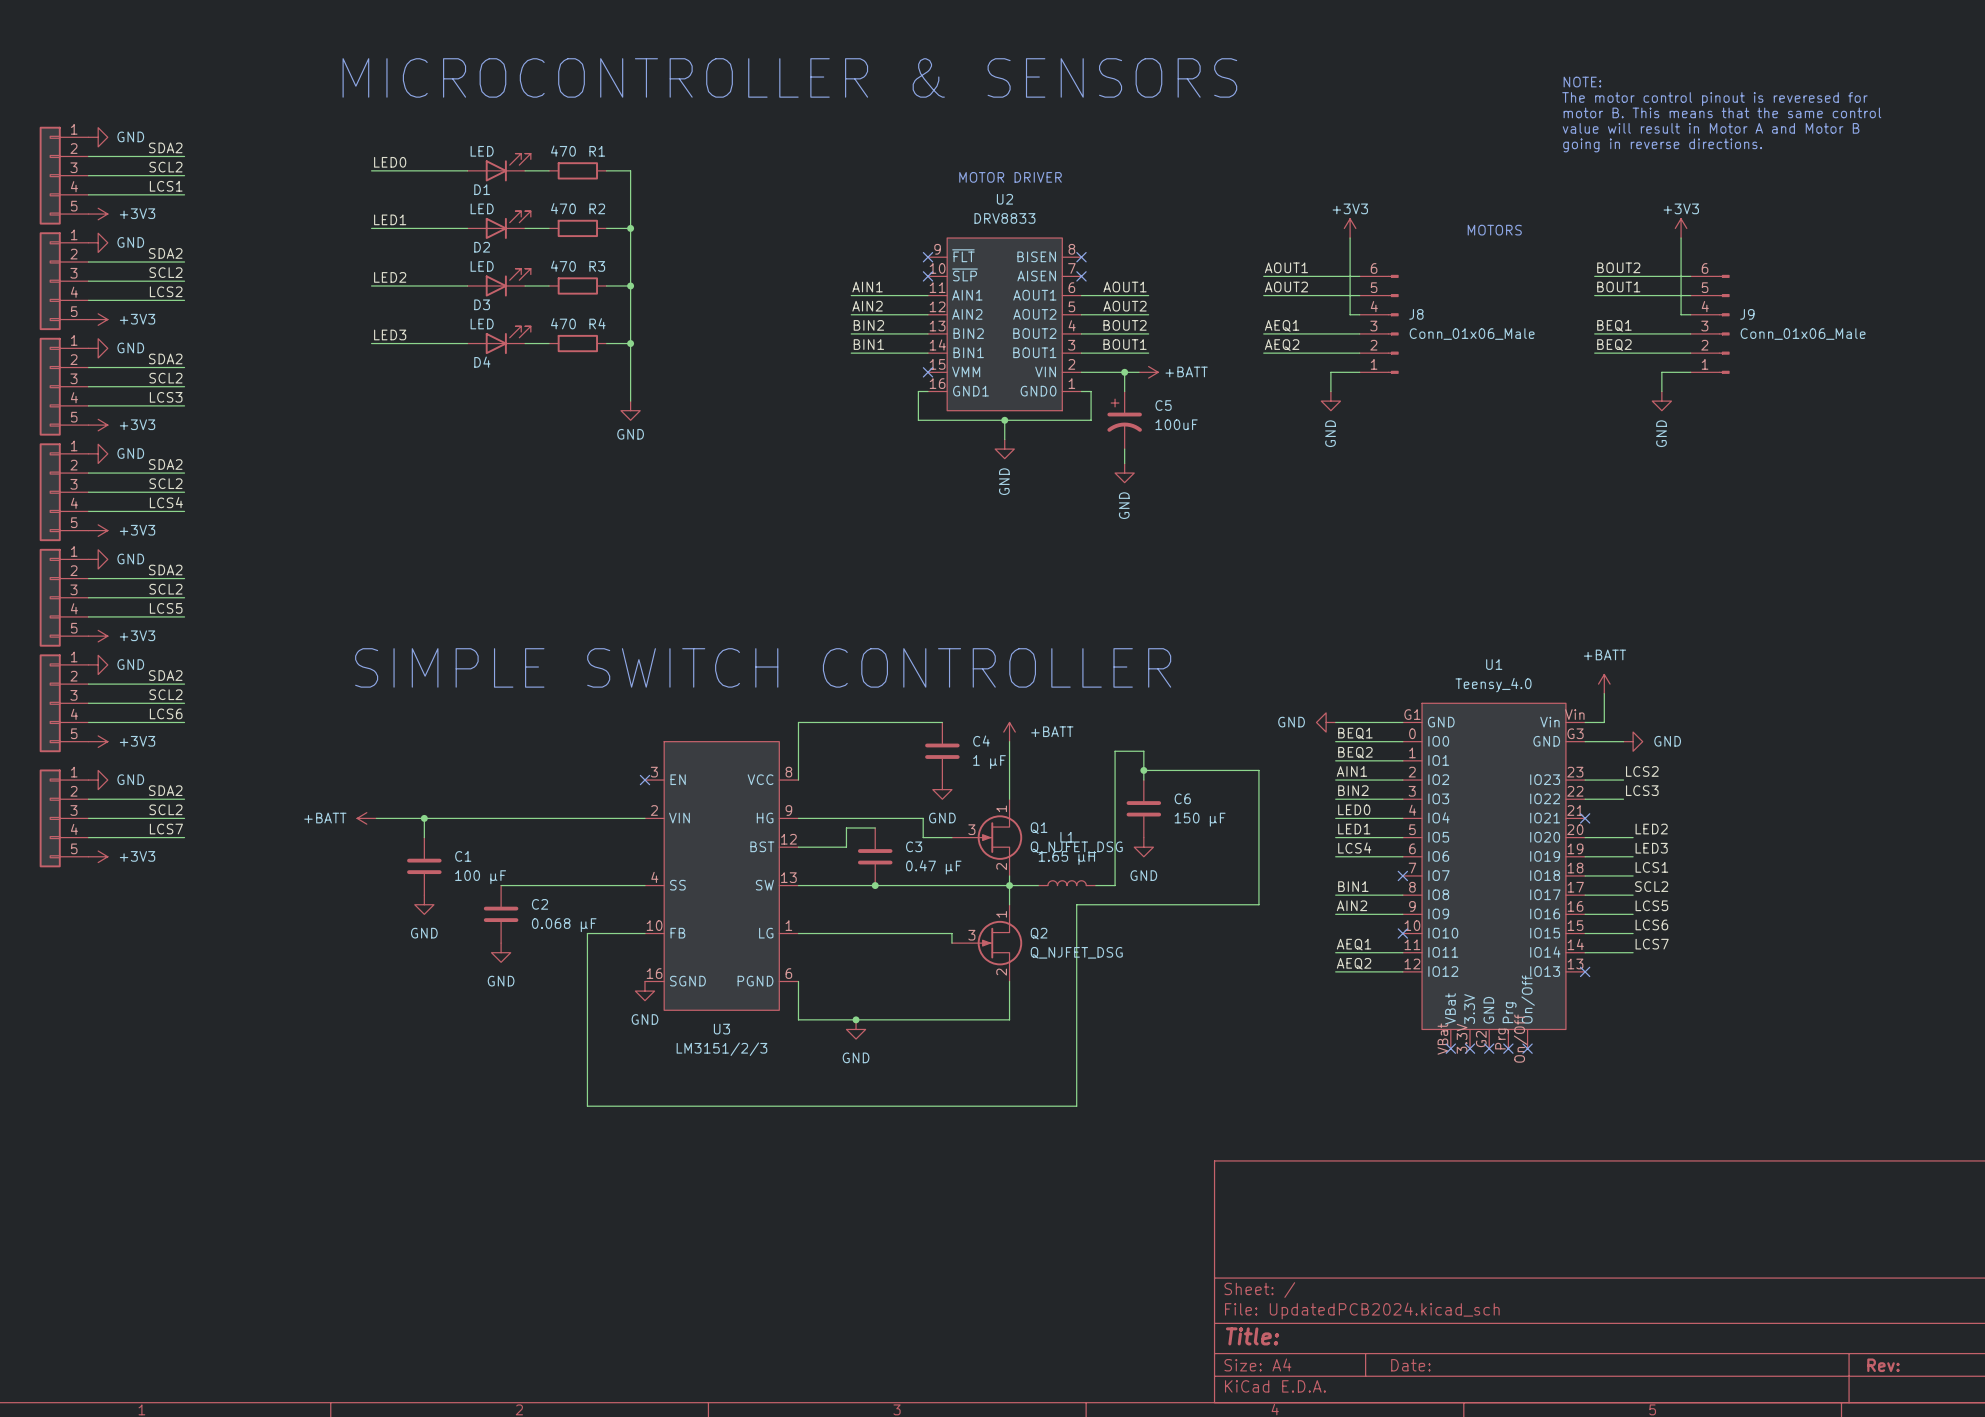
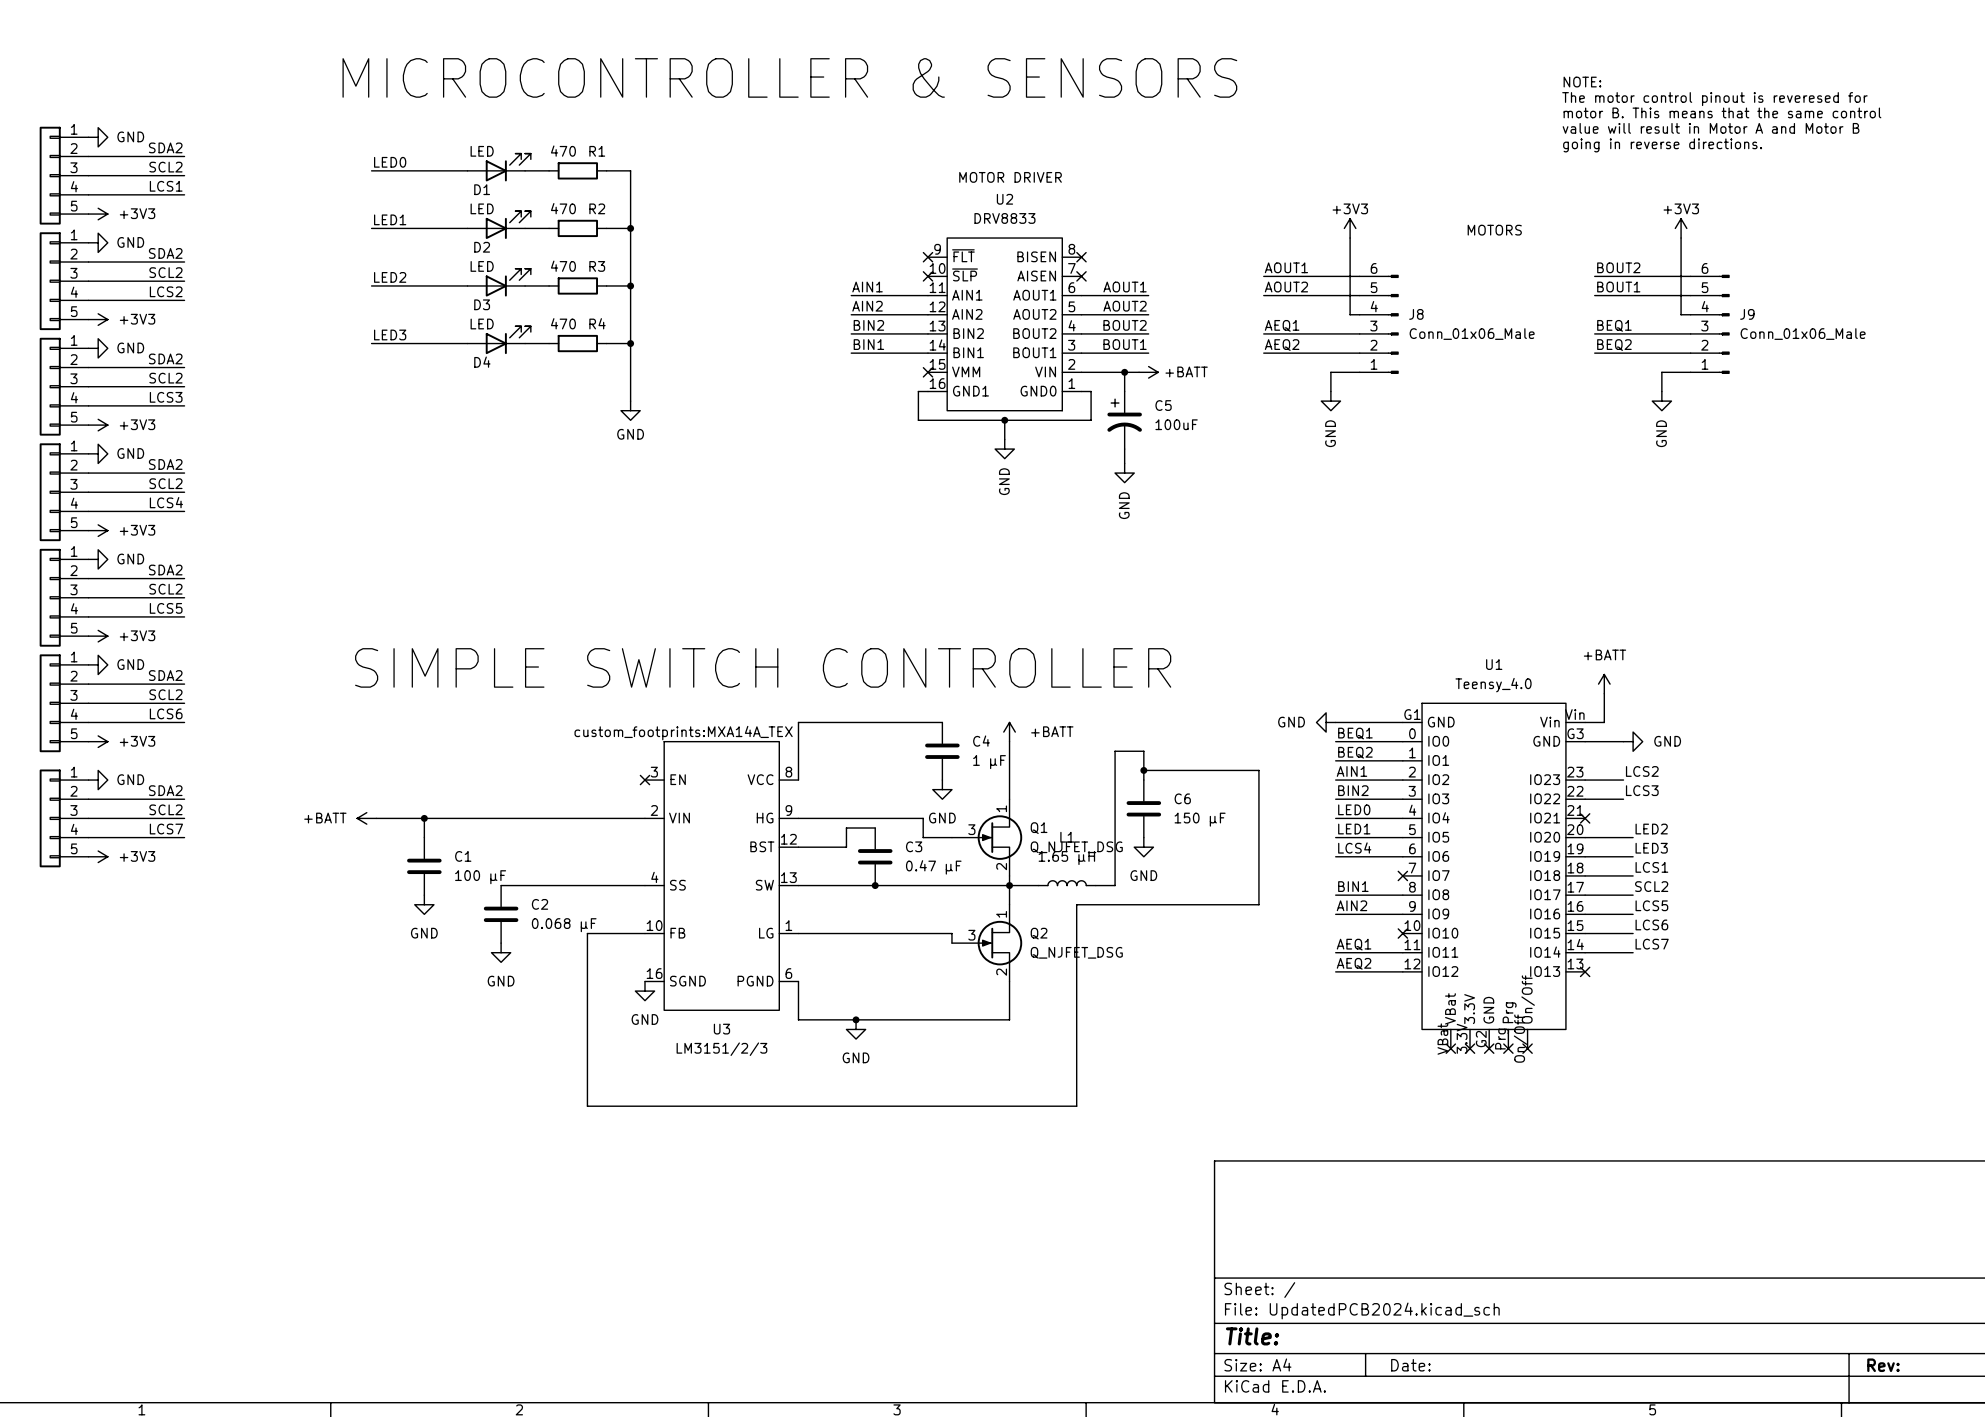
U3 text: none -> custom_footprints:MXA14A_TEX (683, 733)

